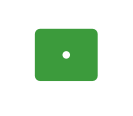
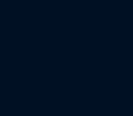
part: (66, 54) -> none

